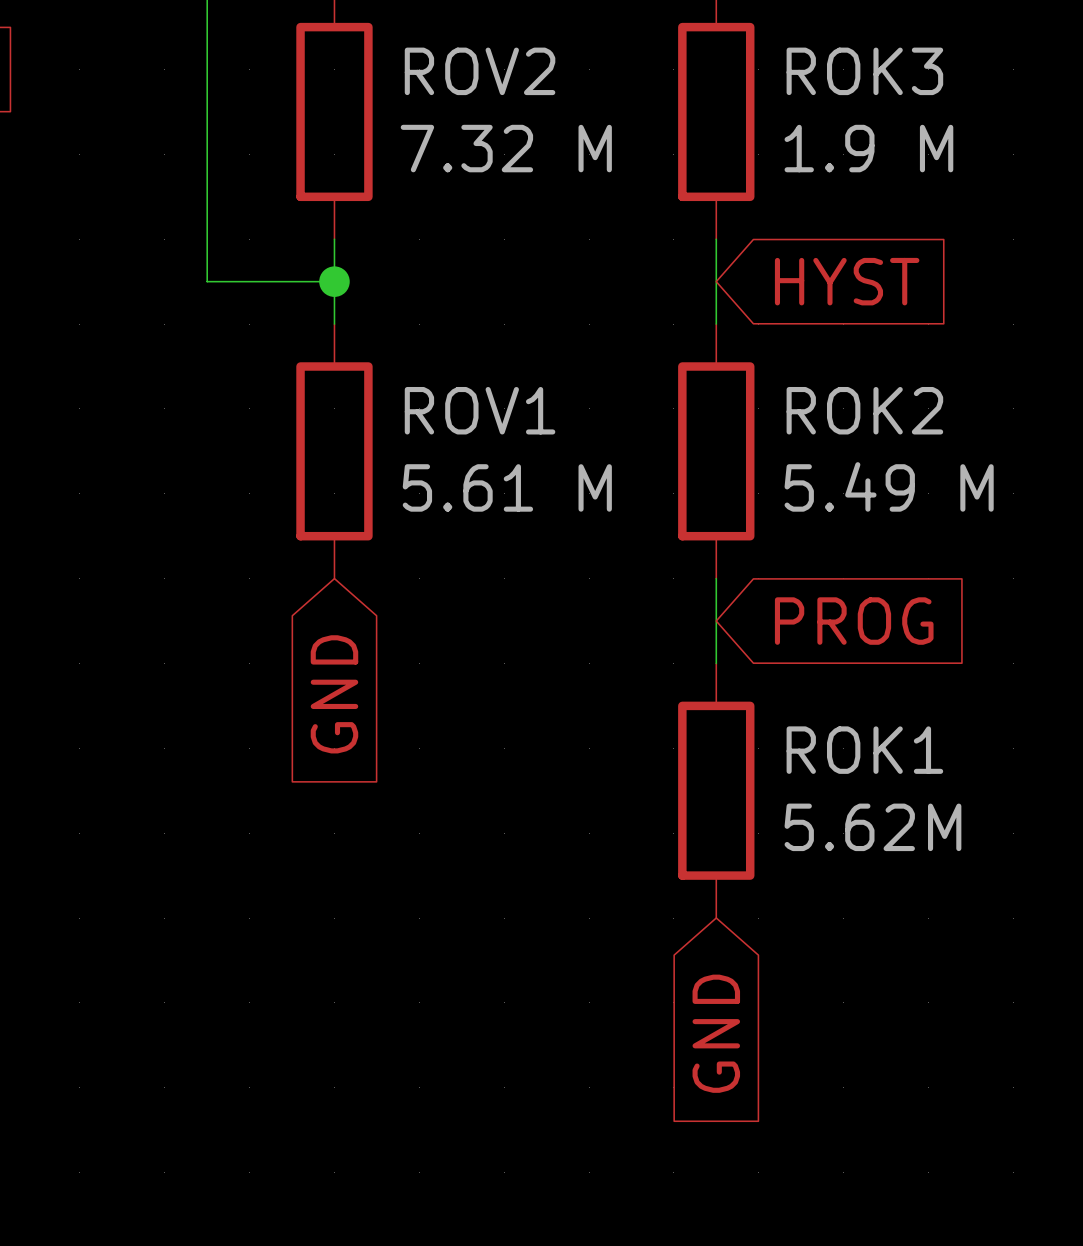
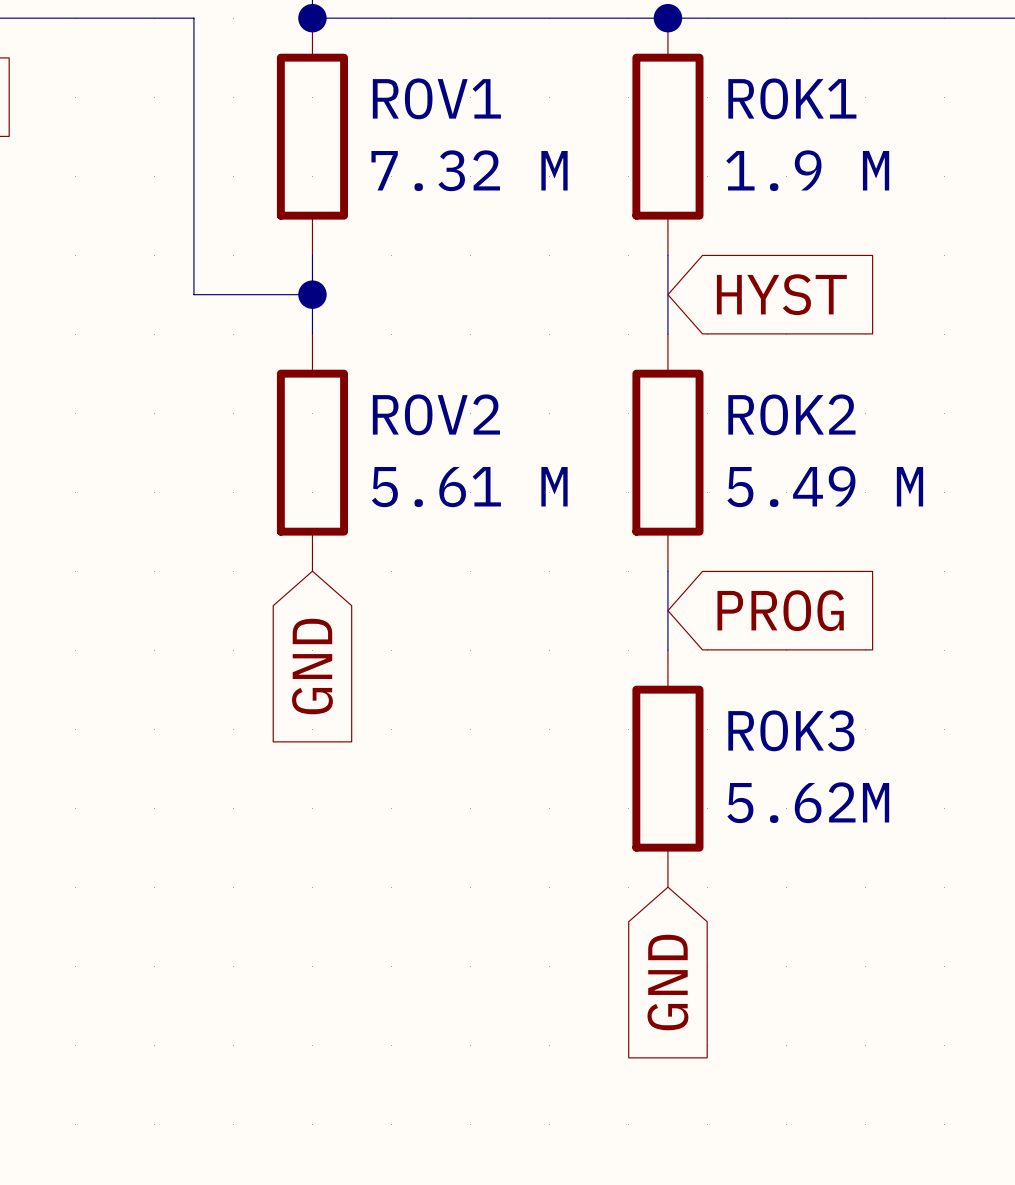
ROV2 name: ROV2 (480, 71) -> ROV1 (436, 98)
ROK3 name: ROK3 (864, 71) -> ROK1 (792, 98)
ROV1 name: ROV1 (480, 410) -> ROV2 (436, 414)
ROK1 name: ROK1 (864, 750) -> ROK3 (791, 730)

